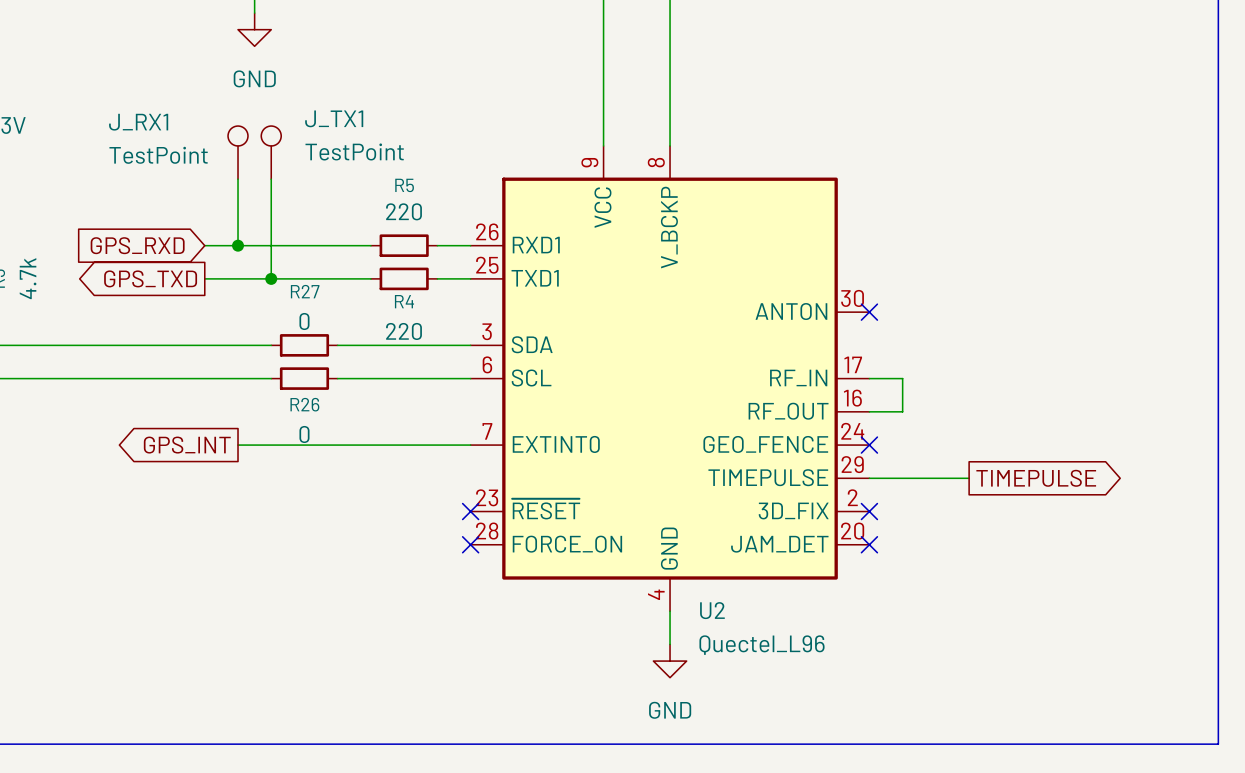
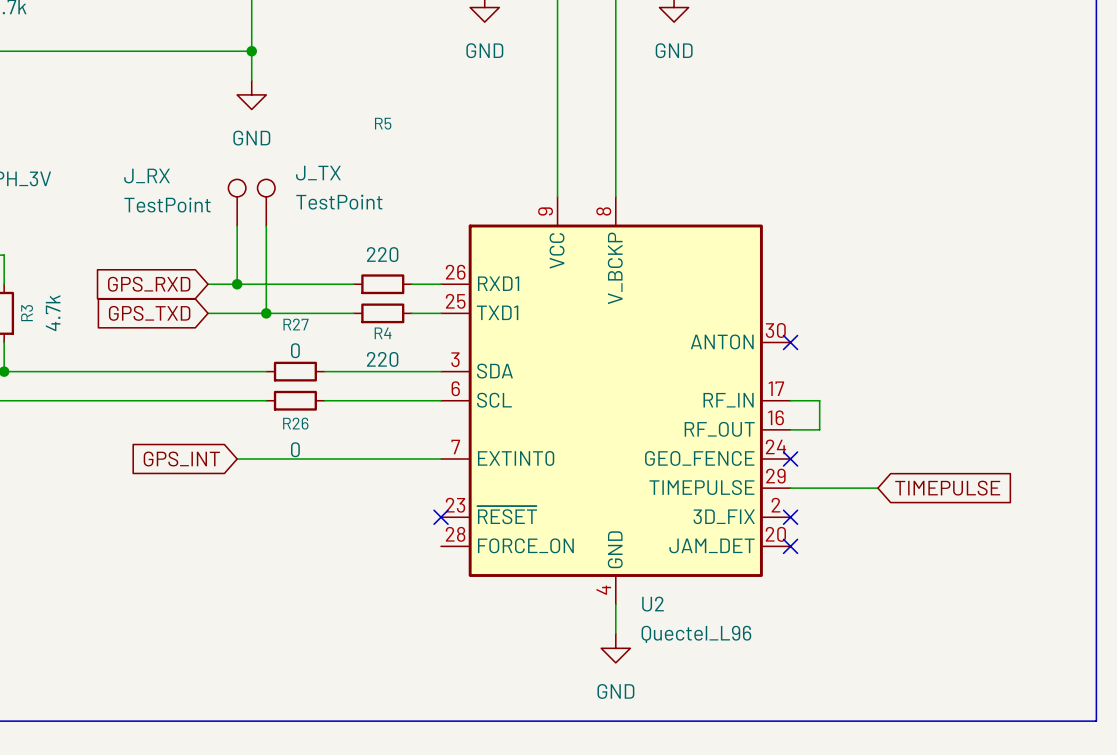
J_TX1 name: J_TX1 (334, 118) -> J_TX (318, 173)
J_RX1 name: J_RX1 (138, 122) -> J_RX (147, 176)
R5 name position: R5 (404, 185) -> R5 (383, 123)
global label shape: output (150, 278) -> input (149, 313)
global label shape: output (187, 445) -> input (181, 459)
global label shape: output (1036, 478) -> input (947, 488)
no-connect mark: (470, 544) -> none

